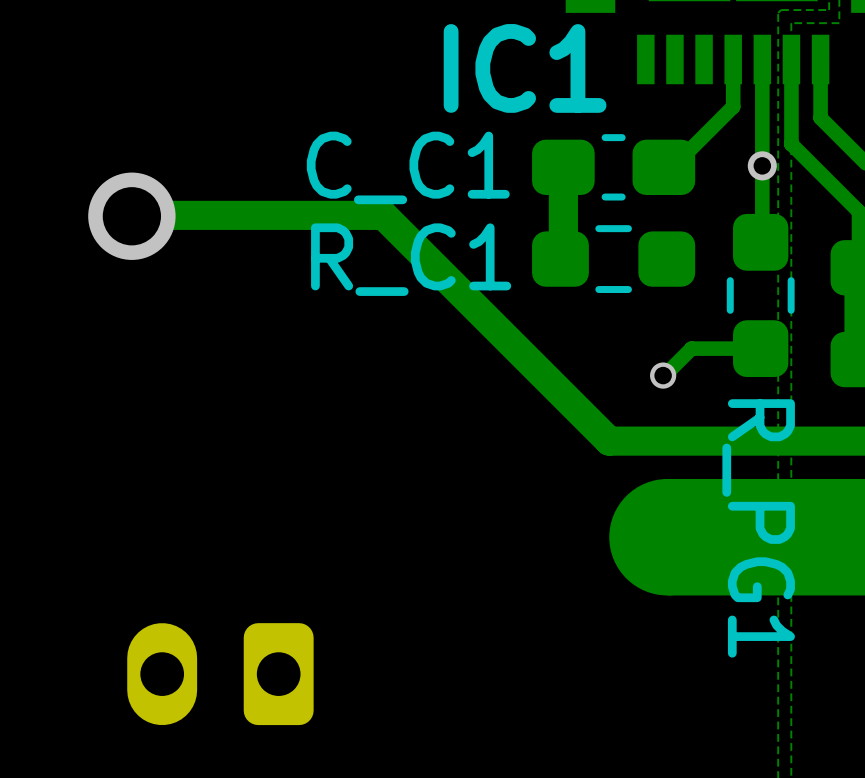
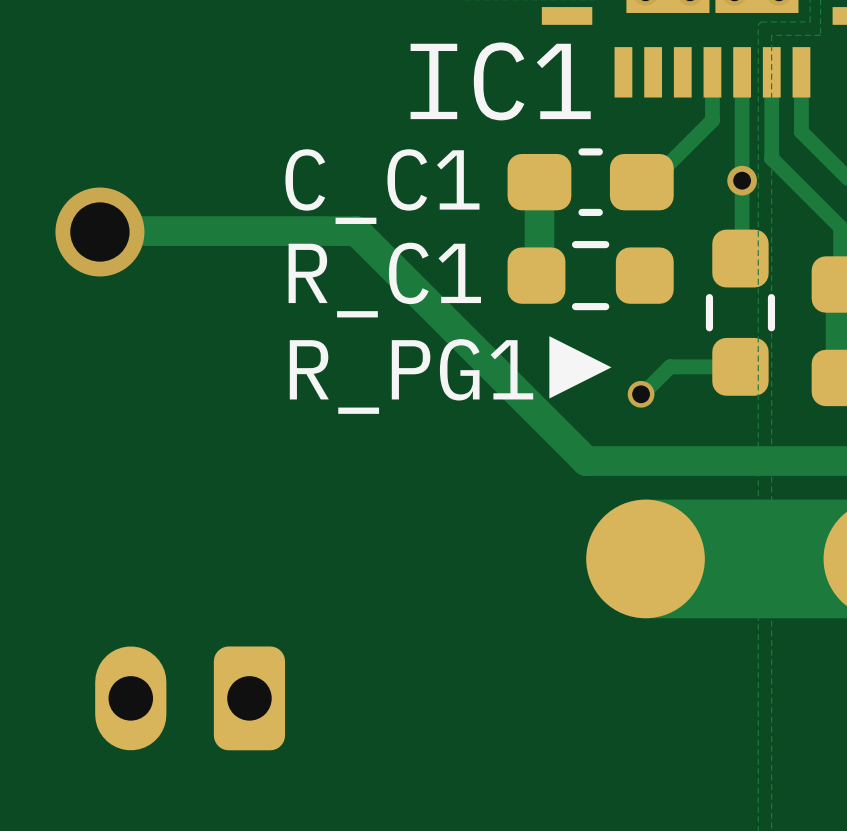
text: none -> ▶ (580, 367)
R_PG1 name rotation: 0° (758, 528) -> 90° counterclockwise (411, 376)
R_PG1 name position: R_PG1 (758, 528) -> R_PG1 (411, 376)

